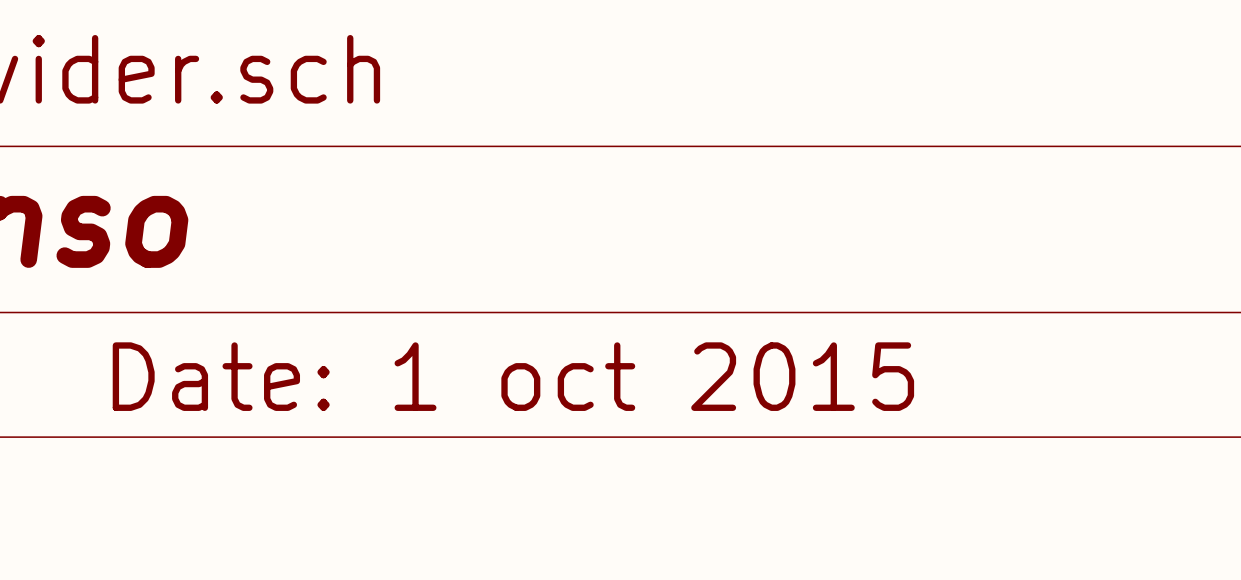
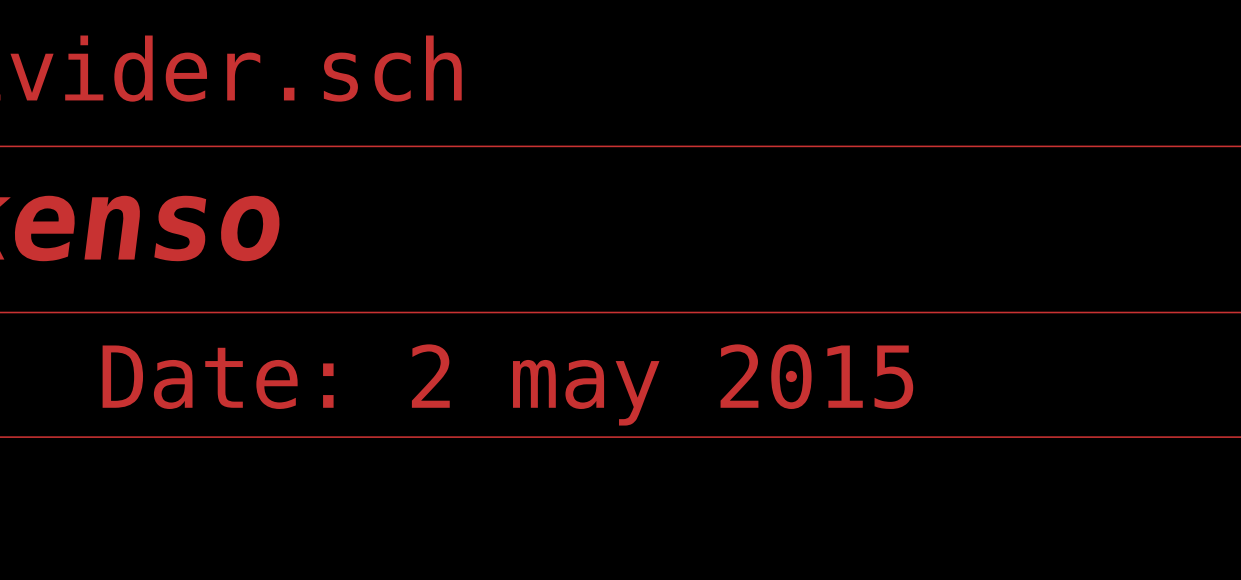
title block: Date: 1 oct 2015 (513, 376) -> Date: 2 may 2015 (507, 384)

